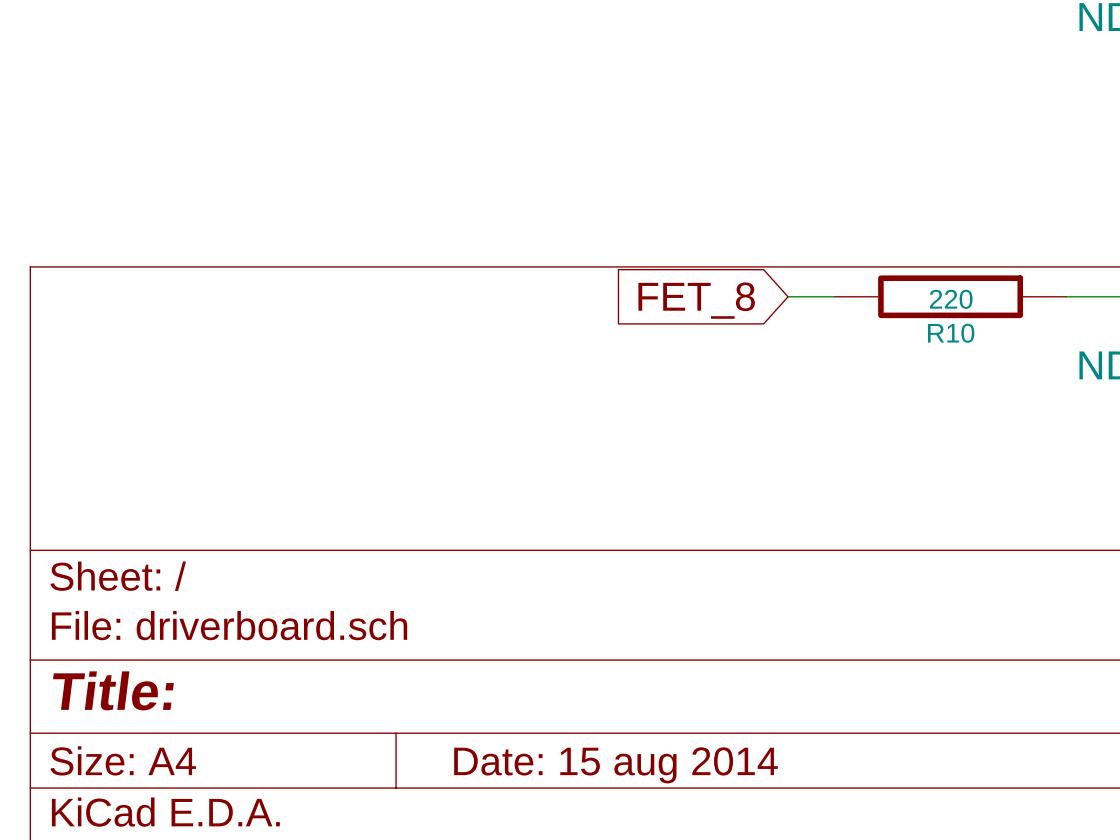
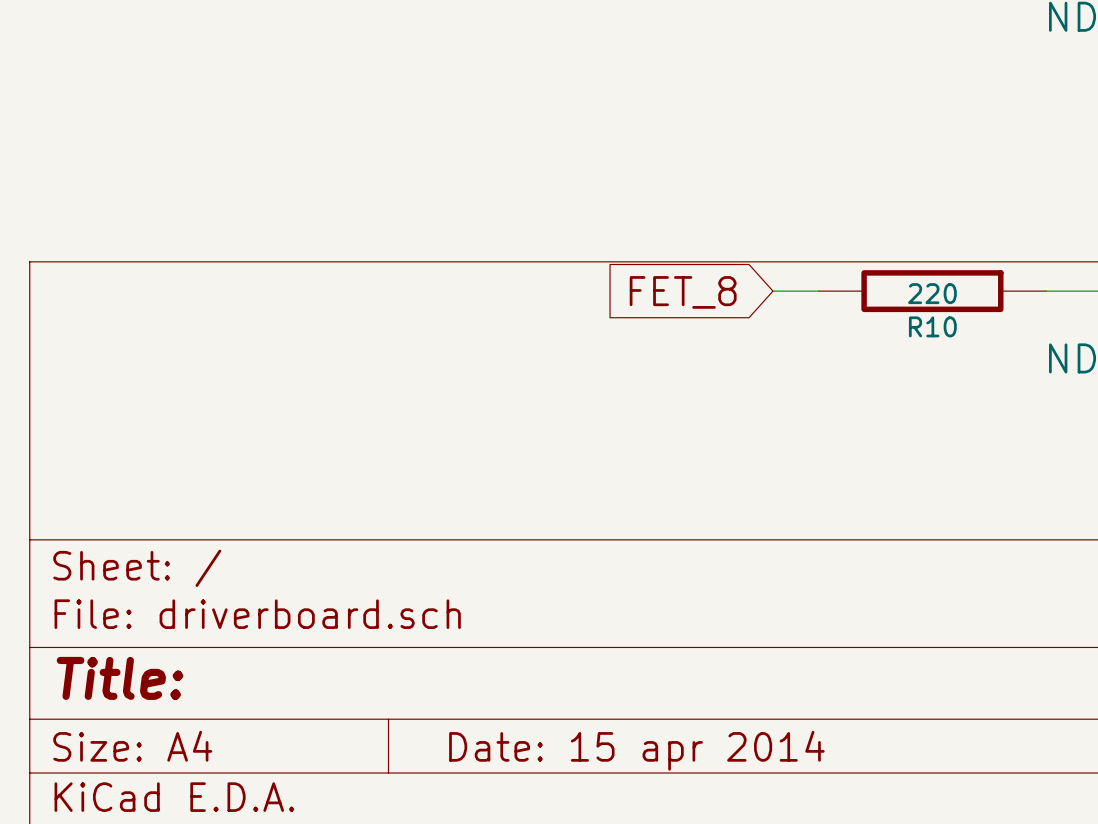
title block: Date: 15 aug 2014 (615, 765) -> Date: 15 apr 2014 (636, 750)

